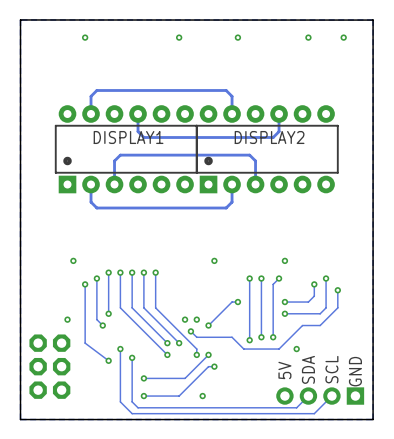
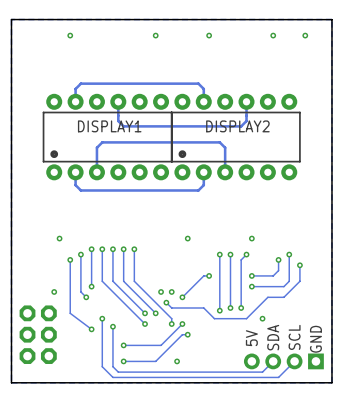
DISPLAY1 footprint: [54, 105, 198, 194] -> [42, 93, 173, 181]
DISPLAY2 footprint: [195, 105, 339, 194] -> [170, 93, 301, 181]

